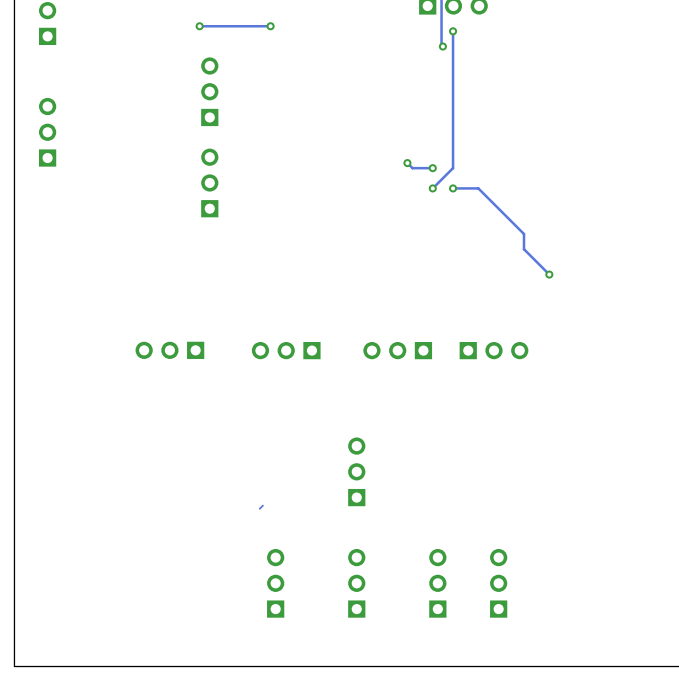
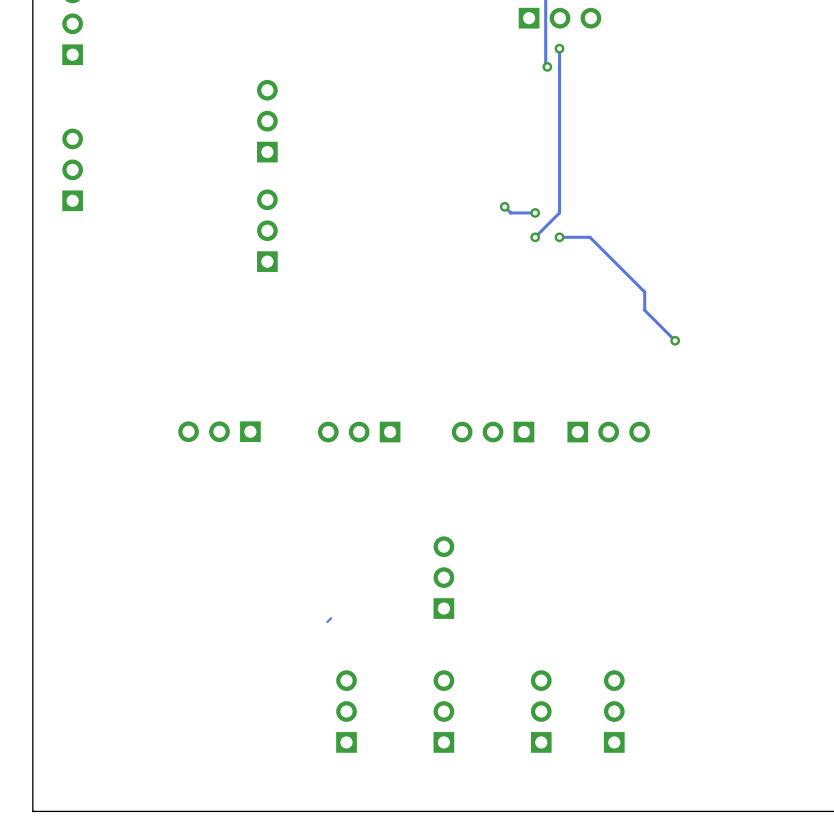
via: (199, 26) -> none
track: (270, 26) (199, 26) -> none
via: (270, 26) -> none

